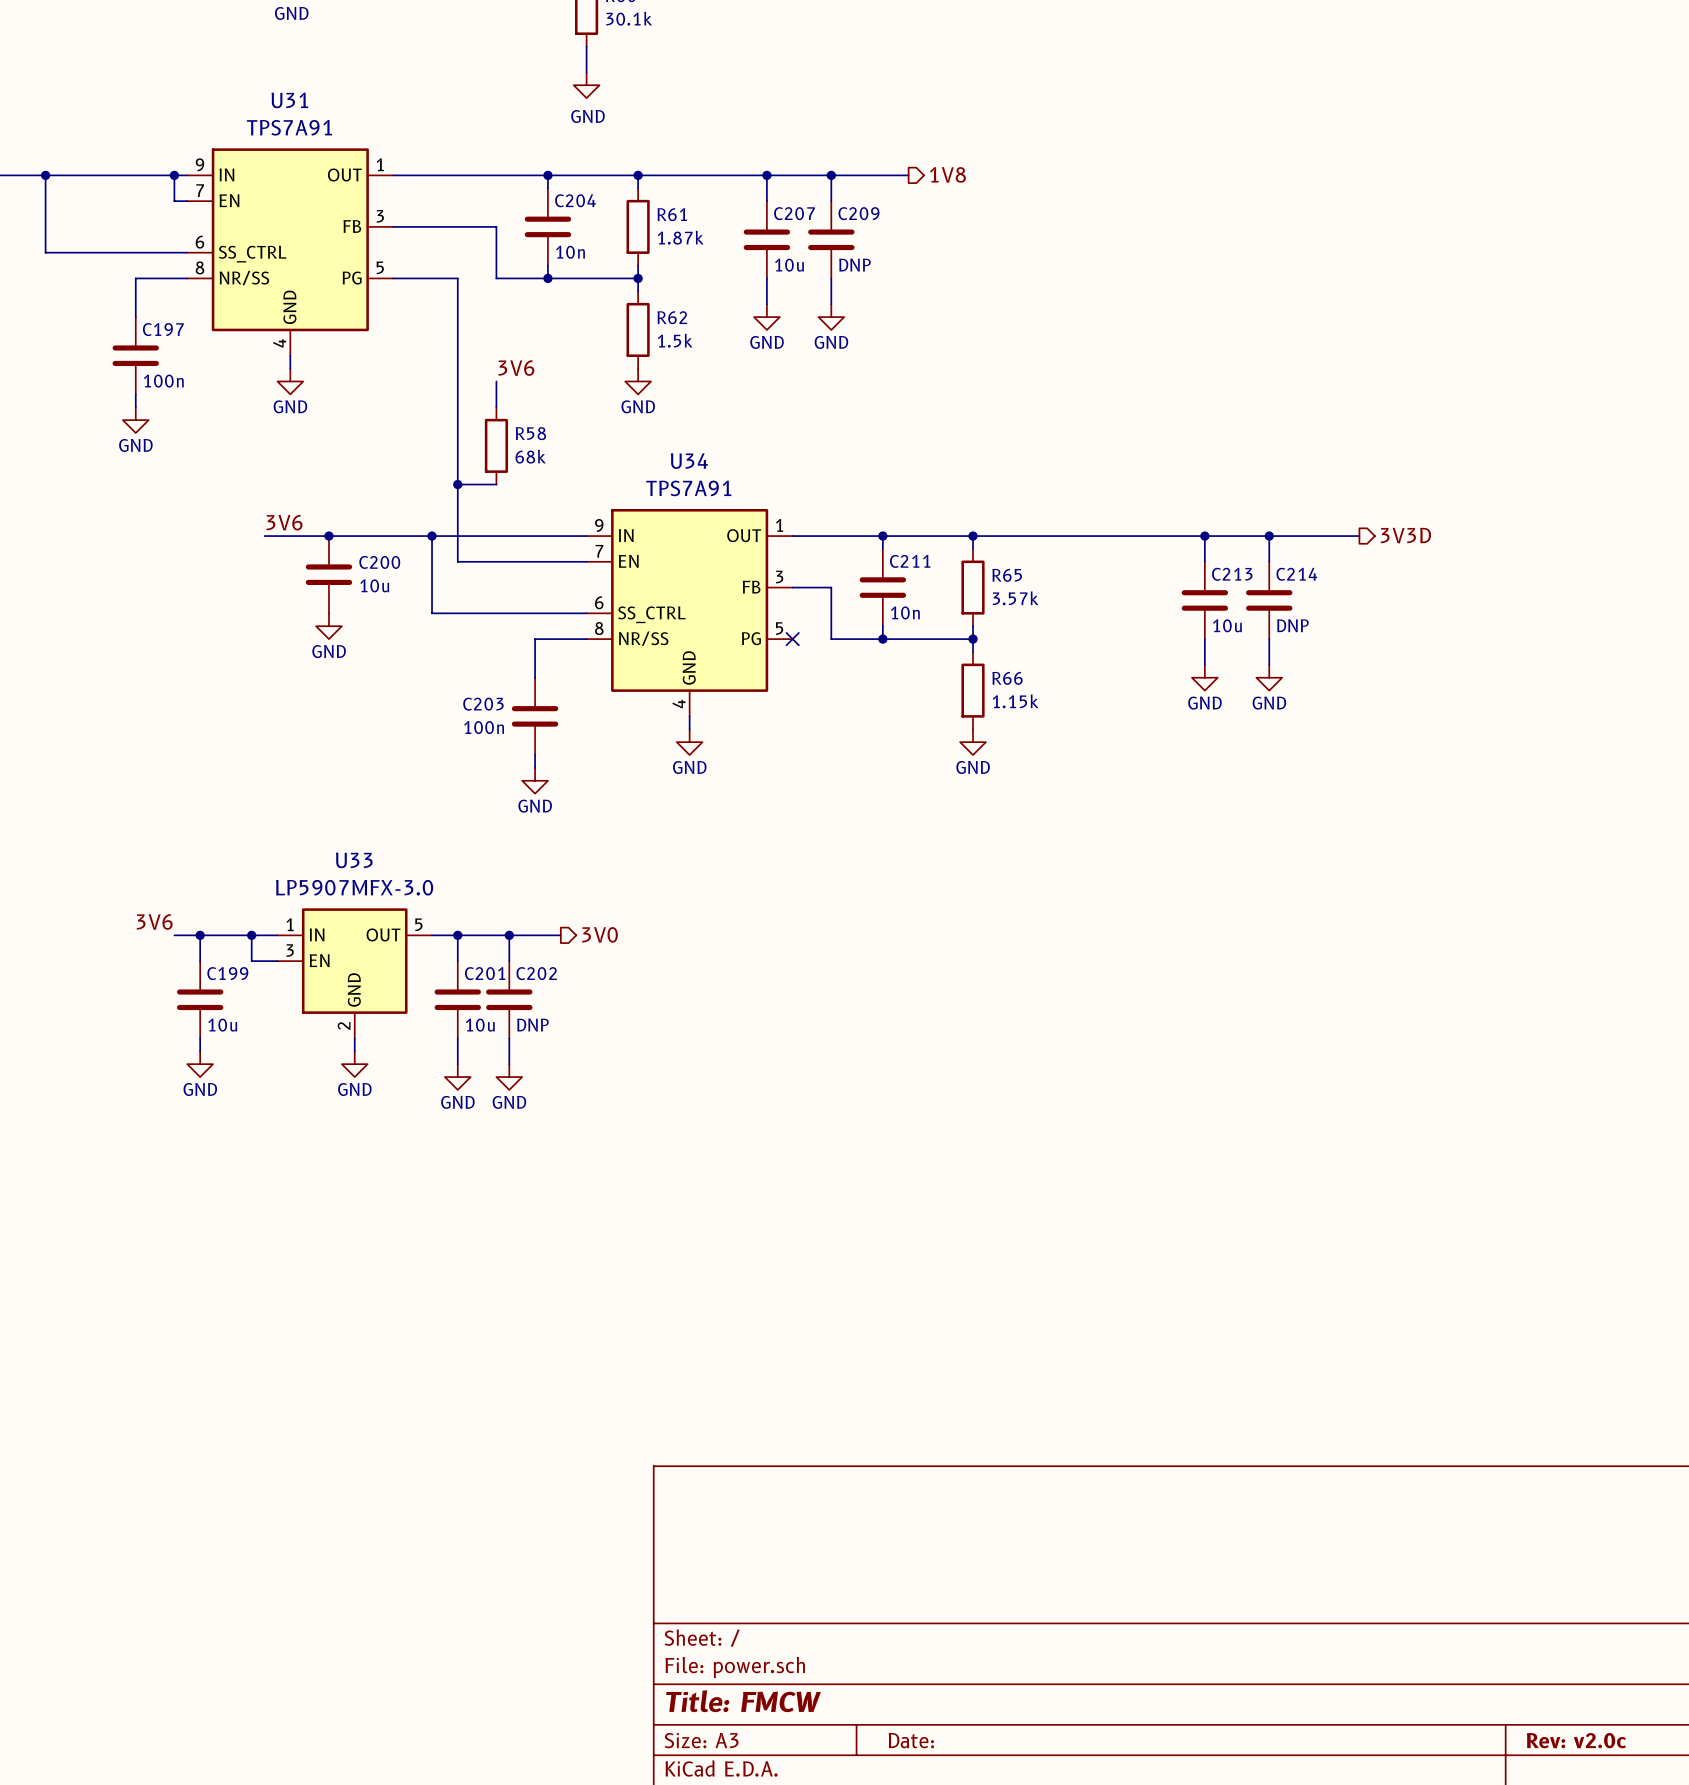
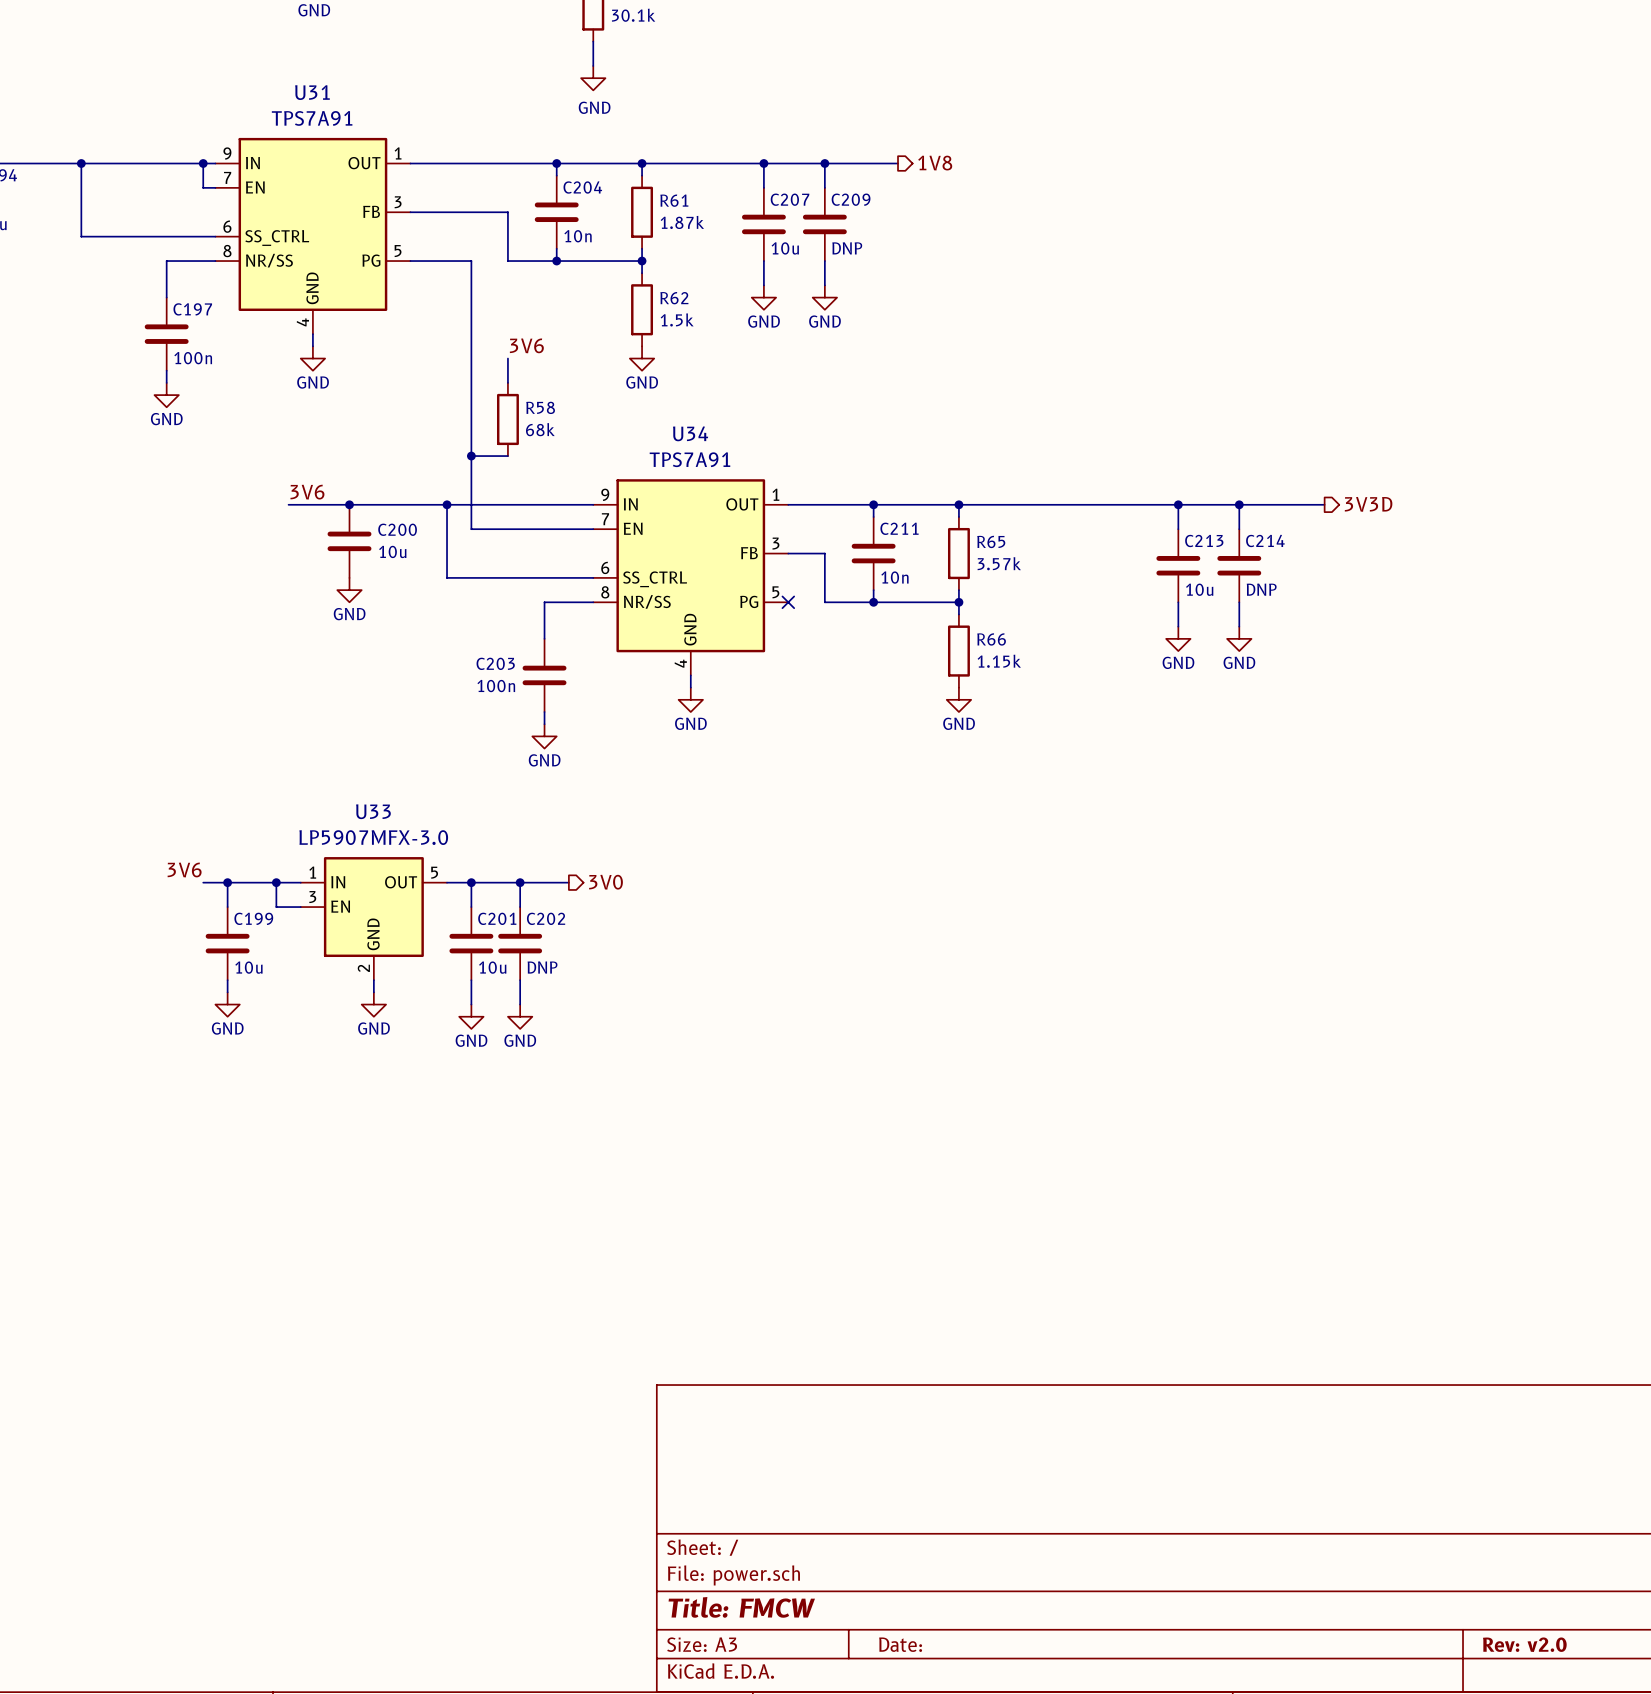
title block: Rev: v2.0c (1576, 1740) -> Rev: v2.0 (1524, 1644)

